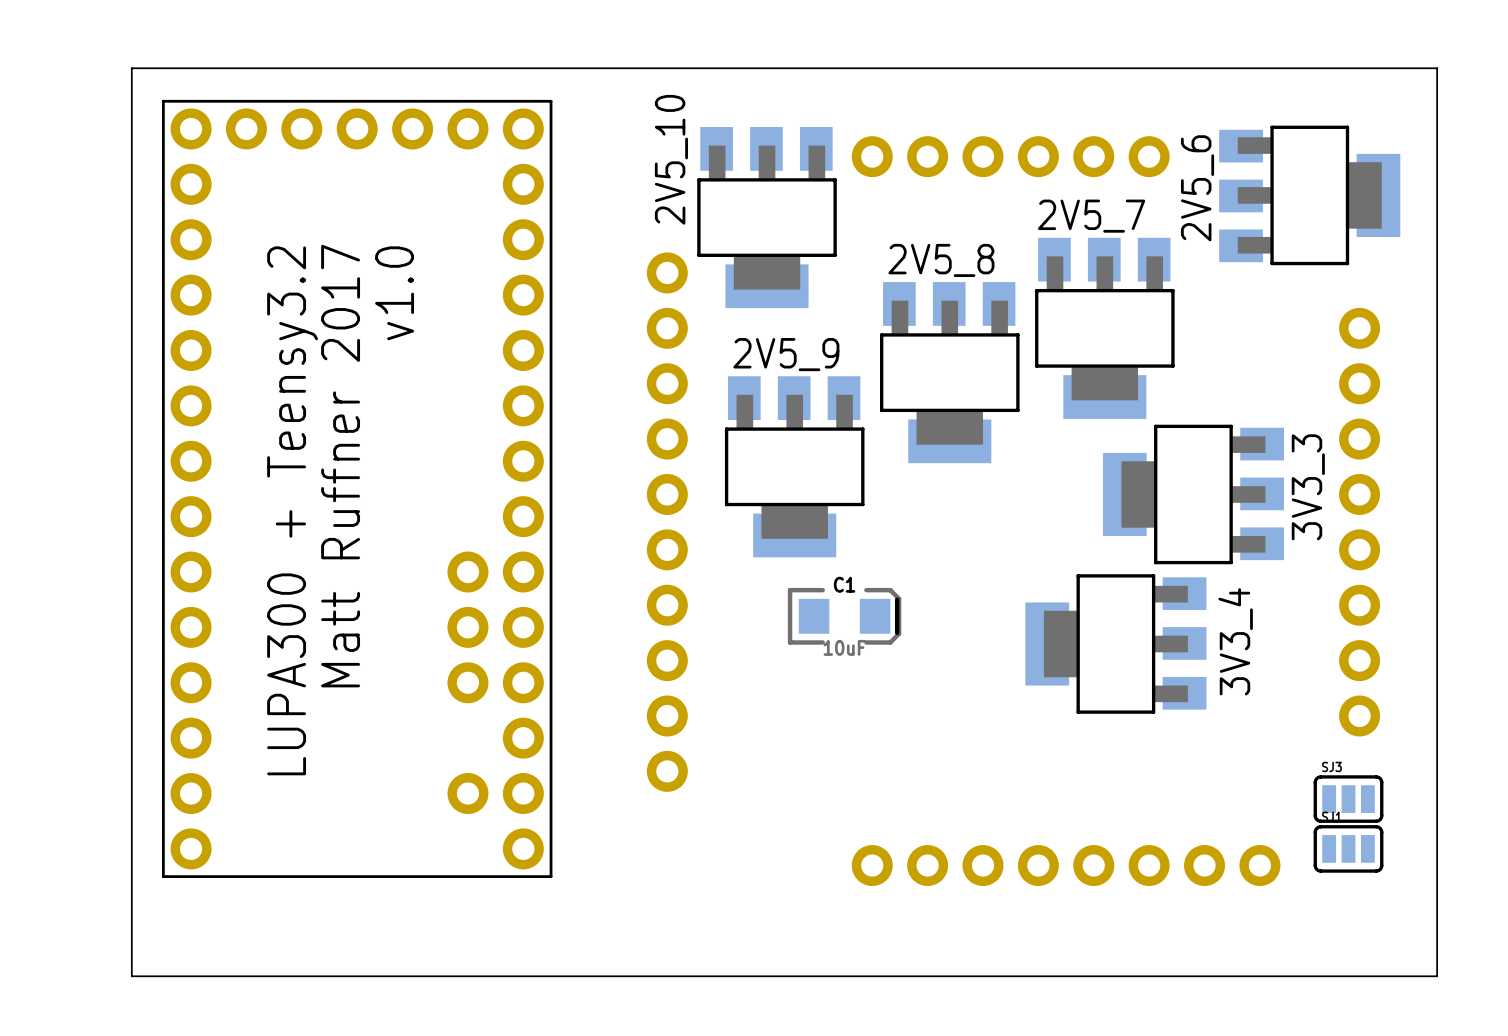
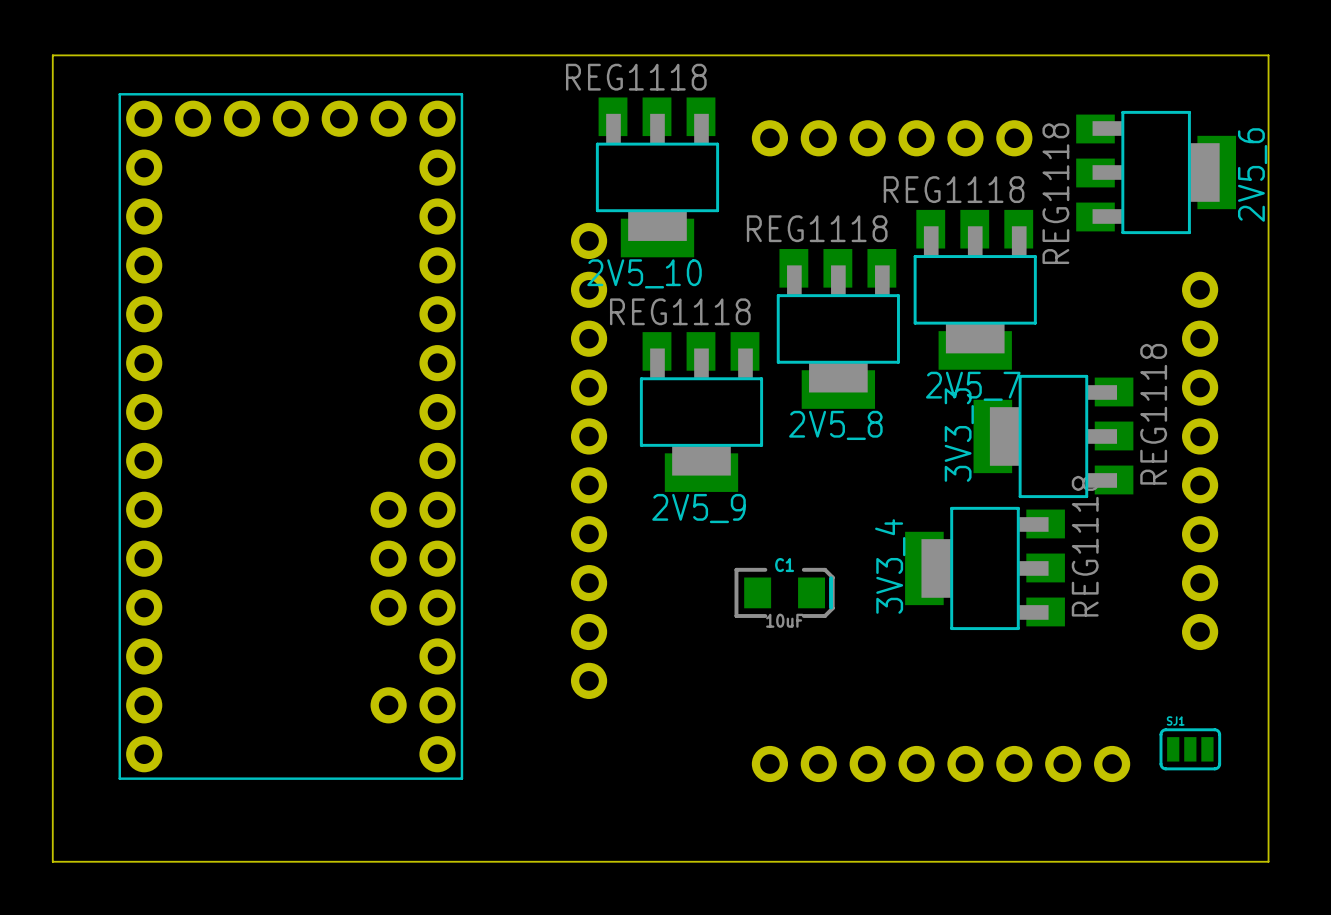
board edge: (1437, 68) (131, 68) (131, 976) -> (1268, 60) (1268, 55) (52, 55) (52, 861) (116, 861)
2V5_10 value: none -> REG1118 (636, 77)
2V5_10 name rotation: 0° (671, 159) -> 90° clockwise (644, 273)
2V5_10 name position: 2V5_10 (671, 159) -> 2V5_10 (644, 273)
2V5_6 name position: 2V5_6 (1197, 188) -> 2V5_6 (1252, 174)
2V5_7 value: none -> REG1118 (954, 189)
2V5_7 name position: 2V5_7 (1091, 216) -> 2V5_7 (973, 386)
2V5_10 position: (767, 217) -> (657, 177)
2V5_6 value: none -> REG1118 (1055, 193)
2V5_8 value: none -> REG1118 (817, 228)
2V5_8 name position: 2V5_8 (941, 260) -> 2V5_8 (835, 425)
text: v1.0 (394, 293) -> none
2V5_9 value: none -> REG1118 (680, 311)
2V5_9 name position: 2V5_9 (786, 354) -> 2V5_9 (699, 508)
text: Matt Ruffner 2017 (340, 466) -> none
3V3_3 value: none -> REG1118 (1153, 414)
3V3_3 name position: 3V3_3 (1308, 487) -> 3V3_3 (959, 435)
part position: (357, 488) -> (290, 436)
text: LUPA300 + Teensy3.2 (292, 510) -> none
C1 position: (844, 616) -> (784, 592)
3V3_4 value: none -> REG1118 (1085, 546)
3V3_4 name position: 3V3_4 (1235, 641) -> 3V3_4 (890, 566)
SJ3: (1348, 799) -> none

